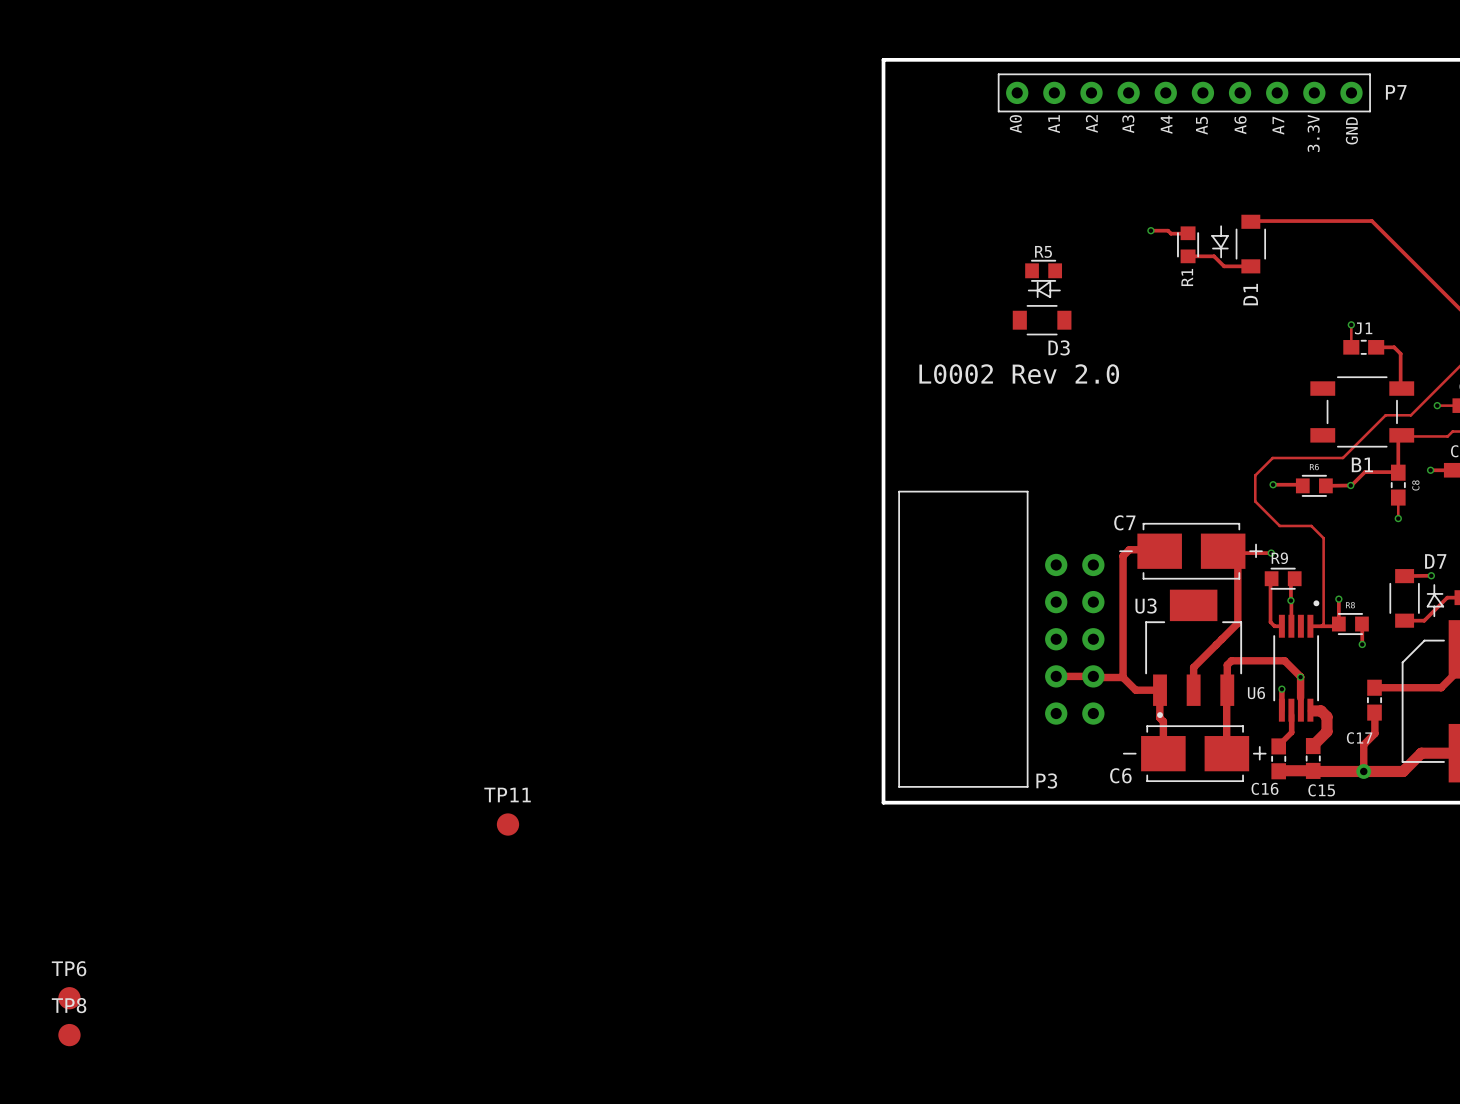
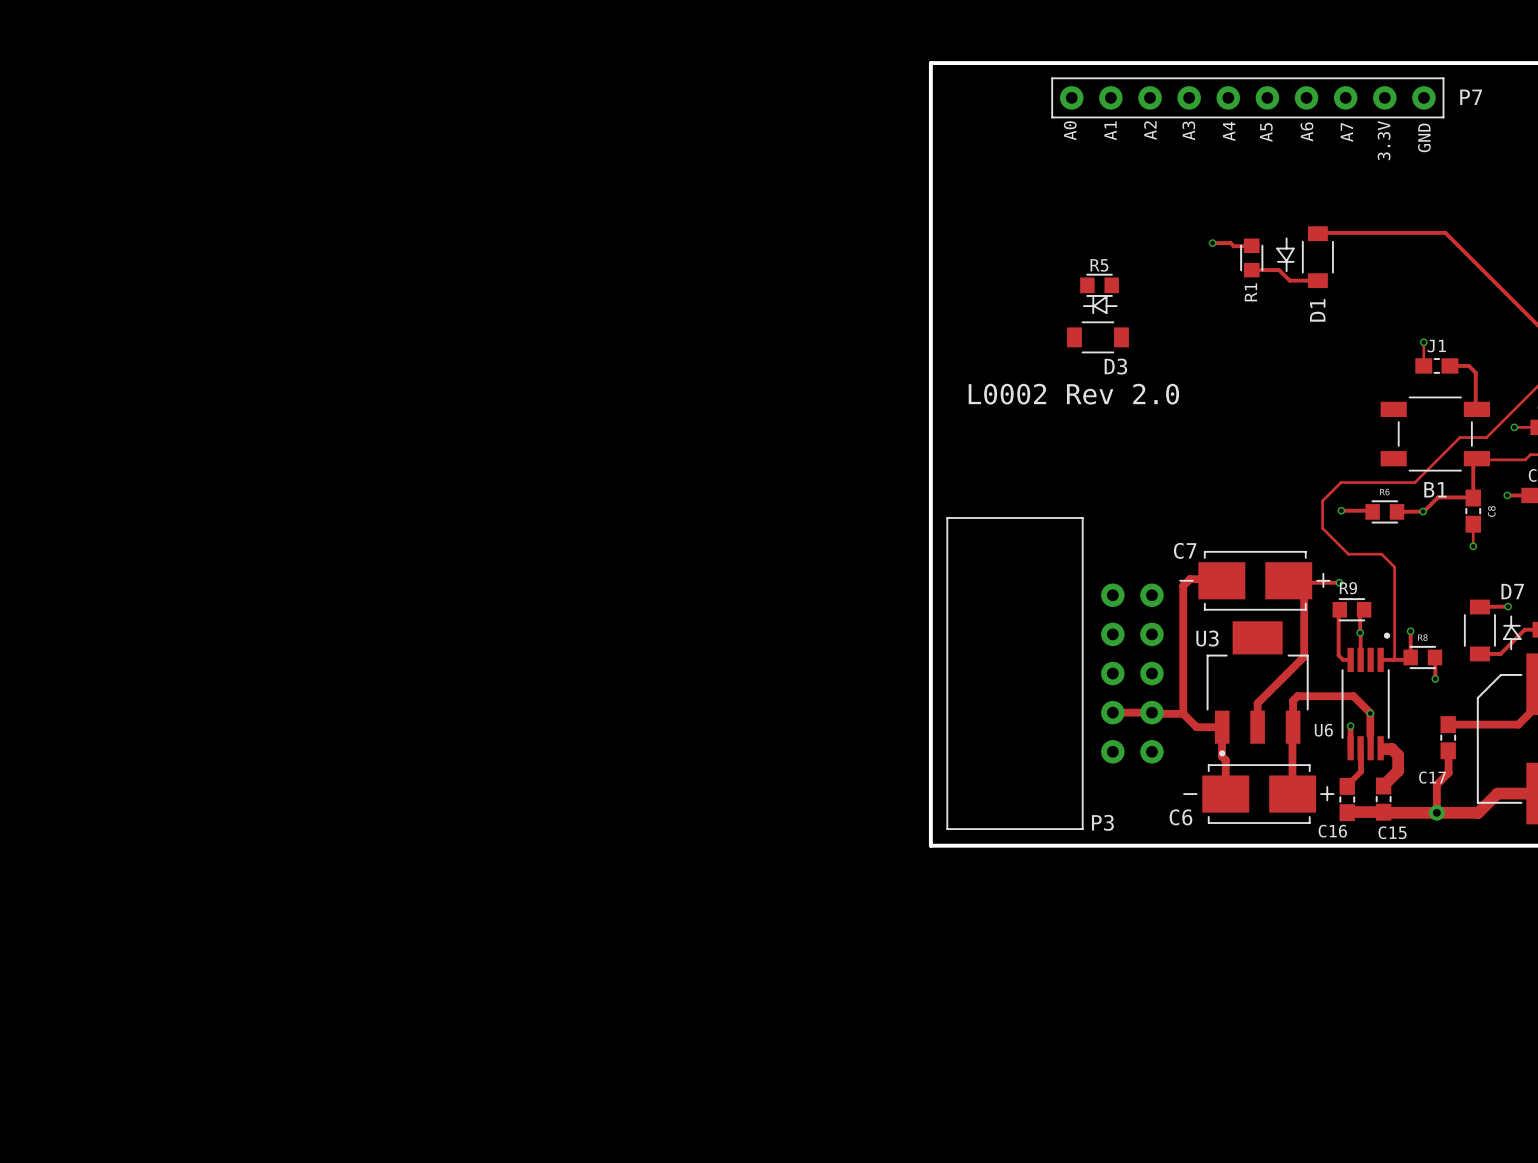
TP11: (508, 824) -> none
TP6: (69, 998) -> none
TP8: (69, 1035) -> none

